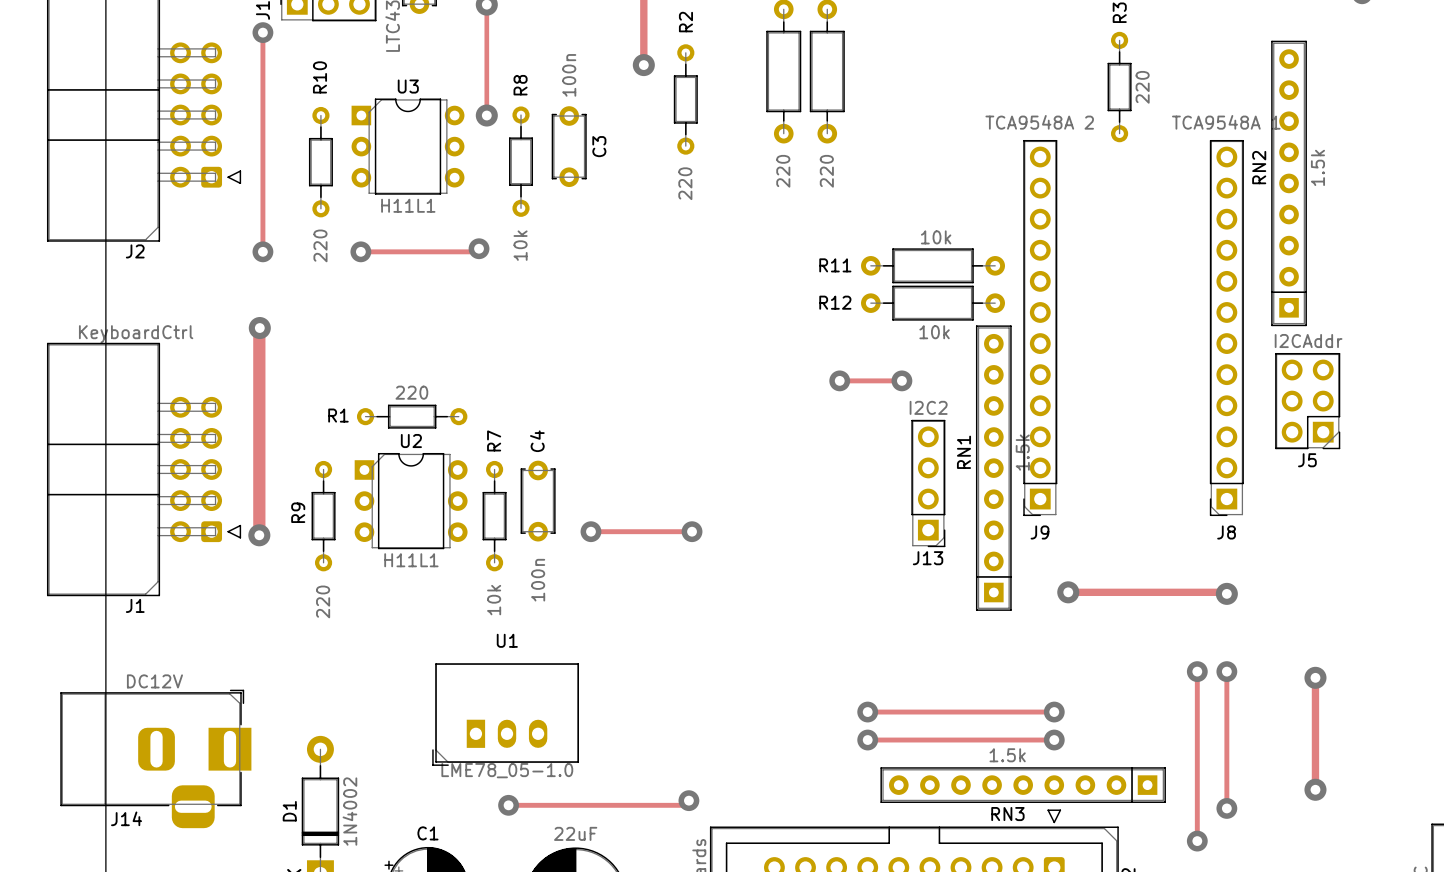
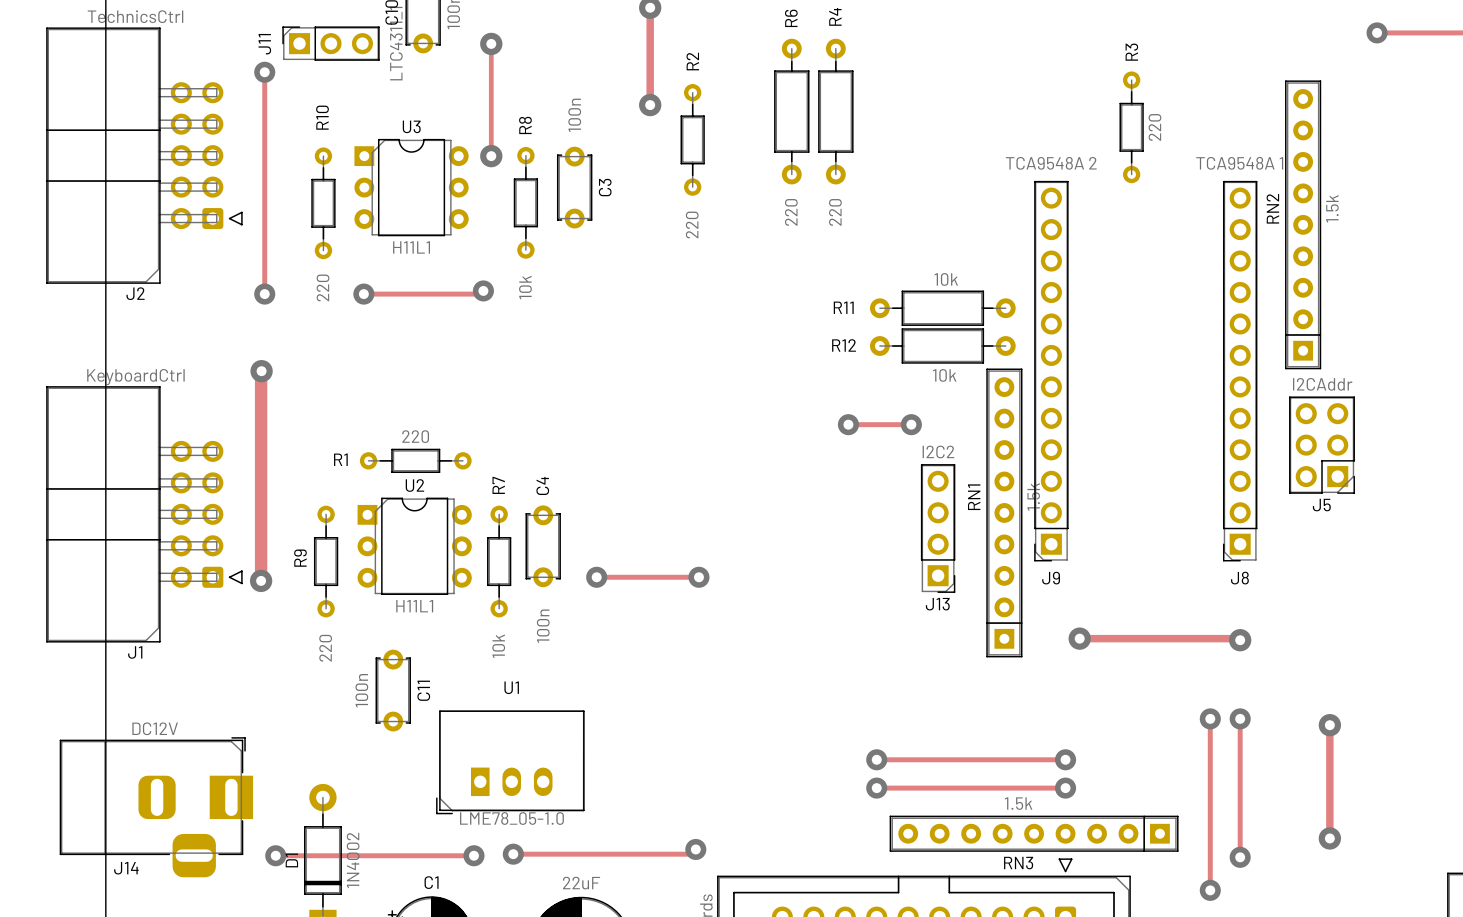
C11: none -> 100n (393, 690)
track: none -> (275, 855) (473, 855)
via: none -> (275, 855)
via: none -> (473, 855)

